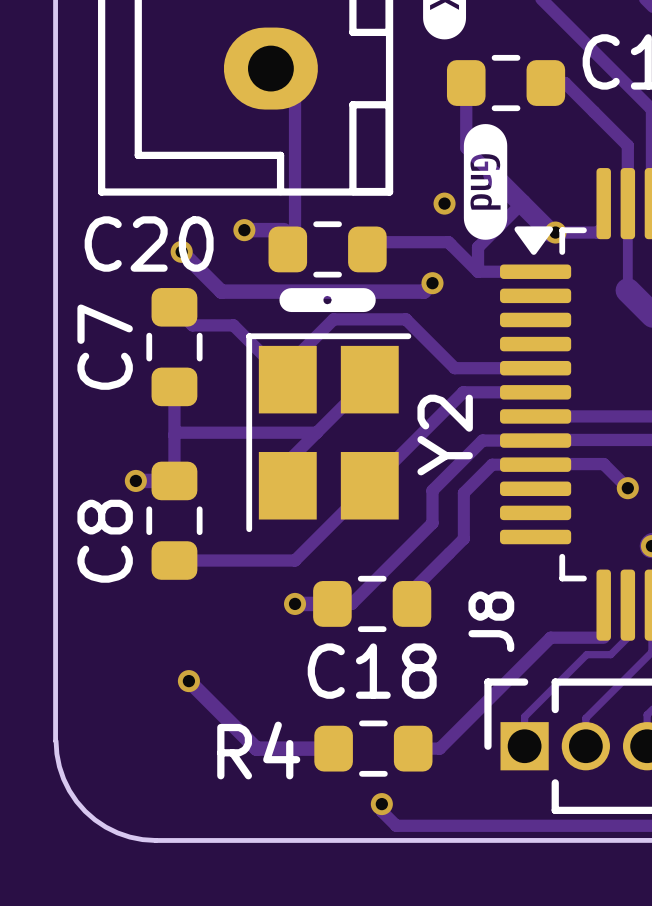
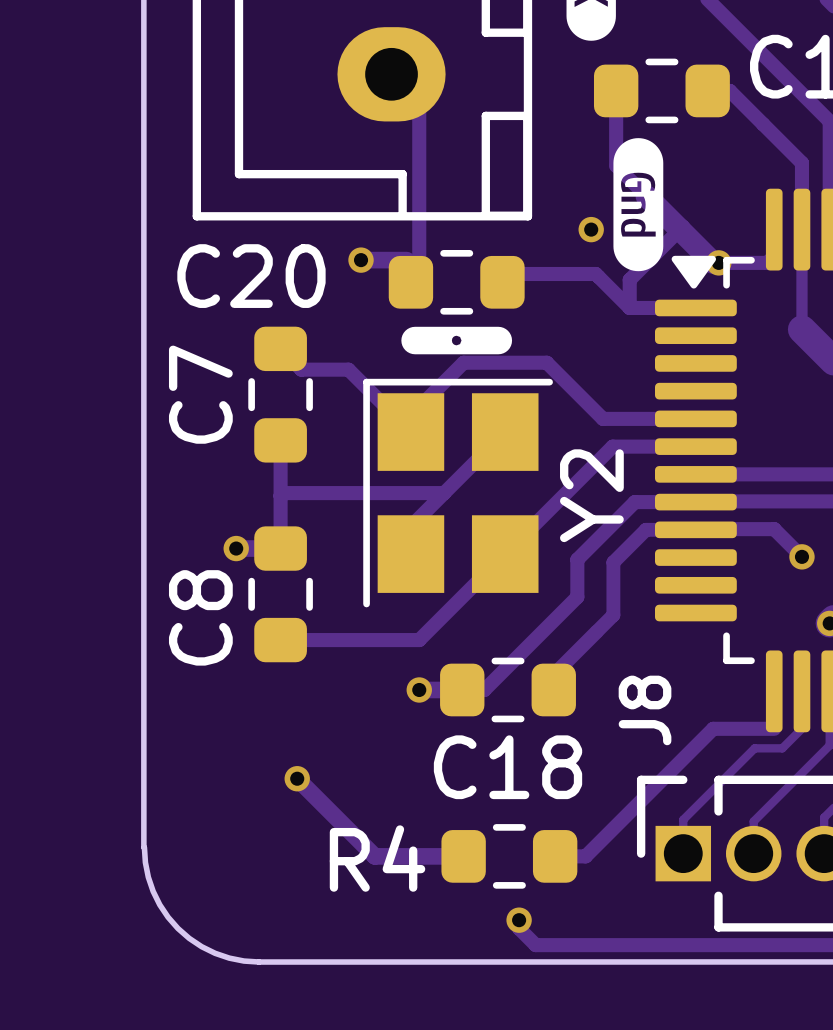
track: (181, 251) (221, 291) (424, 291) (432, 283) -> none
via: (181, 251) -> none
via: (432, 283) -> none

